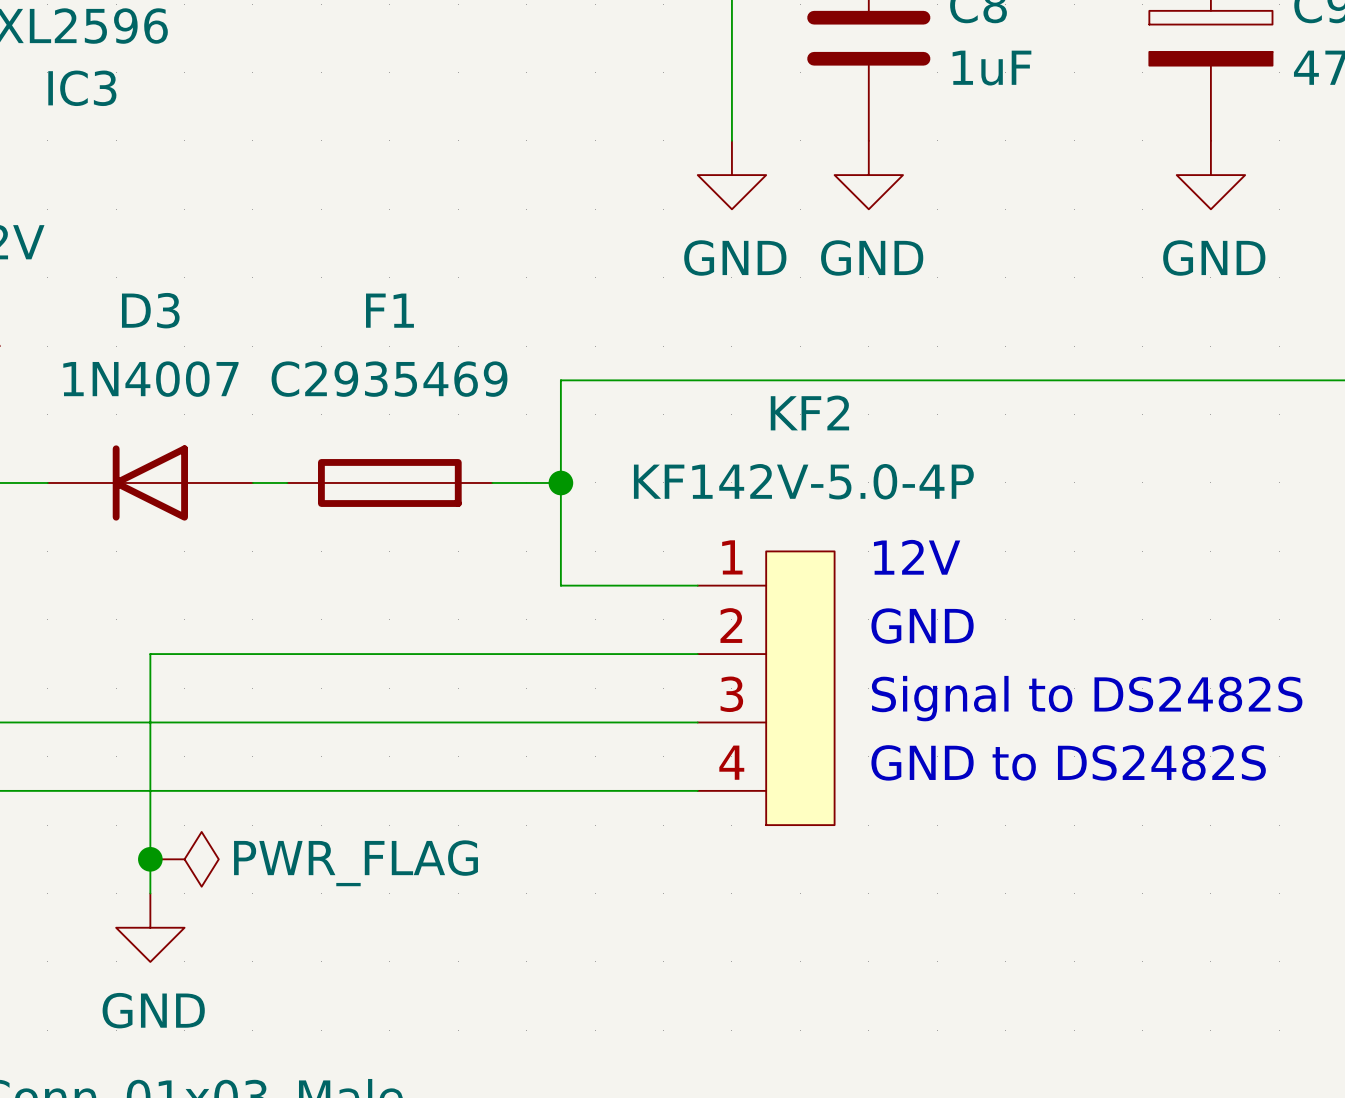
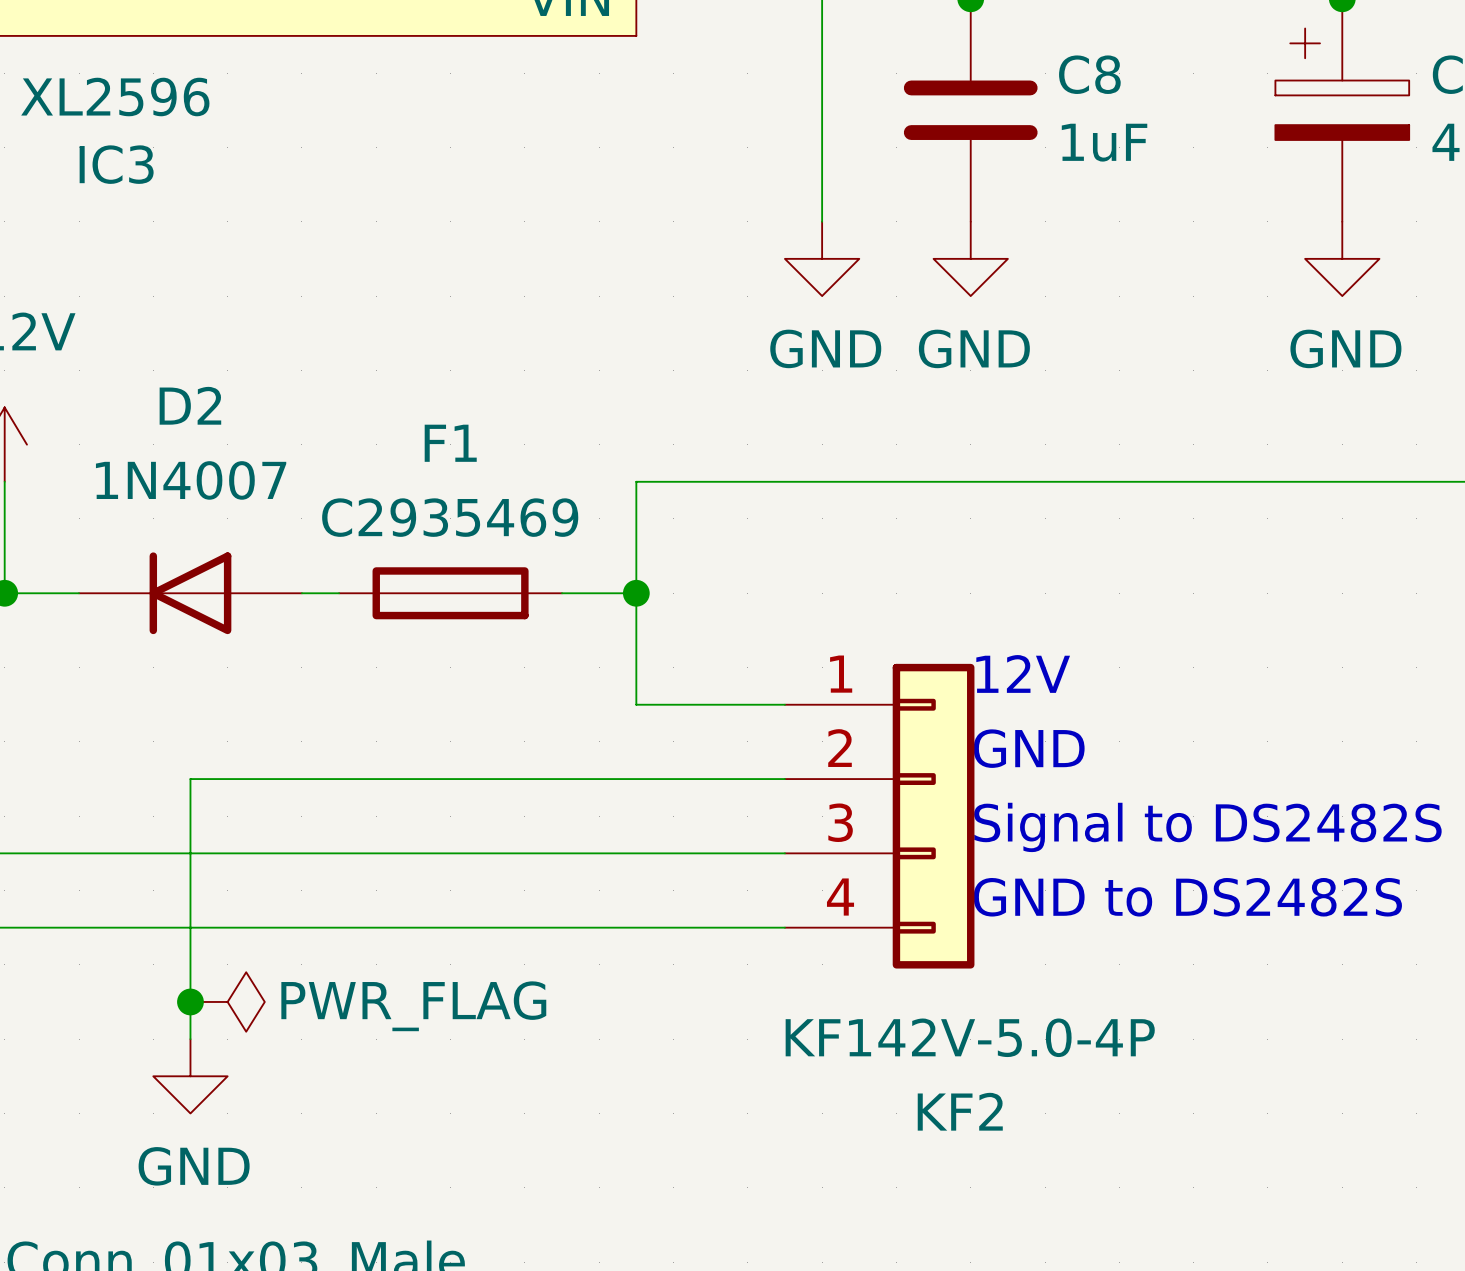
D3 name: D3 (150, 310) -> D2 (190, 405)
F1 name position: F1 (389, 310) -> F1 (450, 443)
F1 value position: C2935469 (389, 379) -> C2935469 (450, 517)
KF2 name position: KF2 (809, 412) -> KF2 (960, 1111)
KF2 value position: KF142V-5.0-4P (803, 481) -> KF142V-5.0-4P (970, 1037)
KF2 symbol: [697, 551, 835, 826] -> [784, 663, 975, 969]

